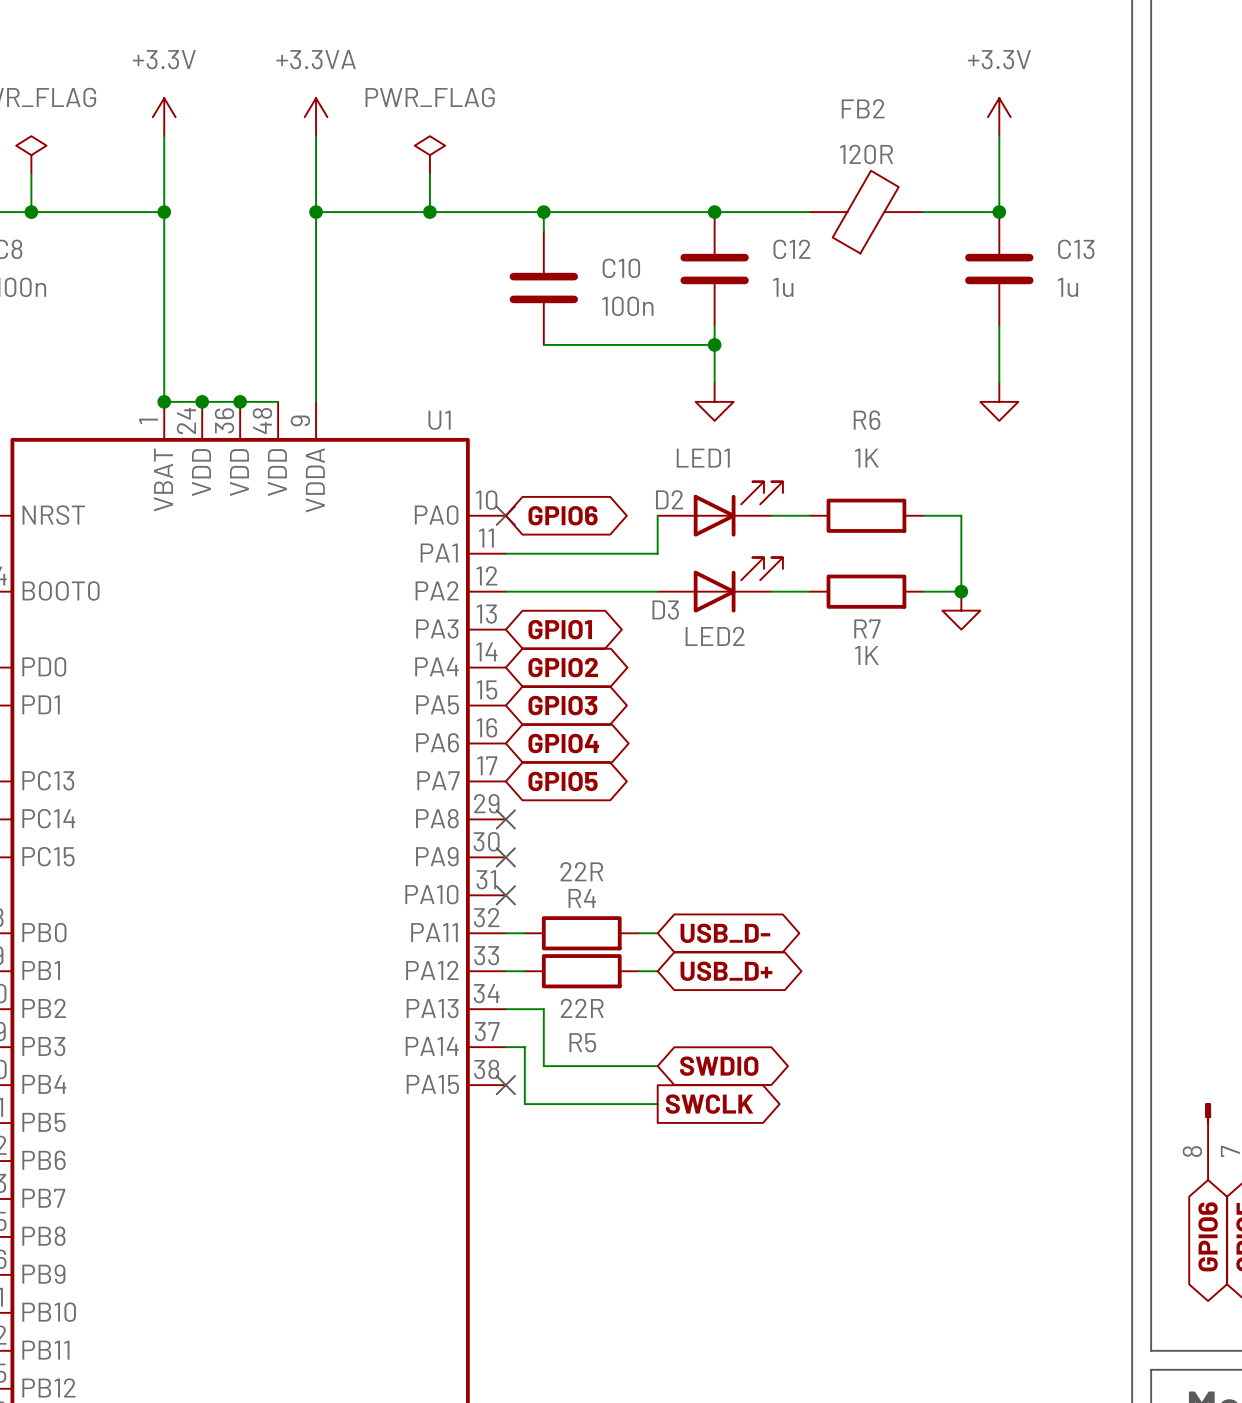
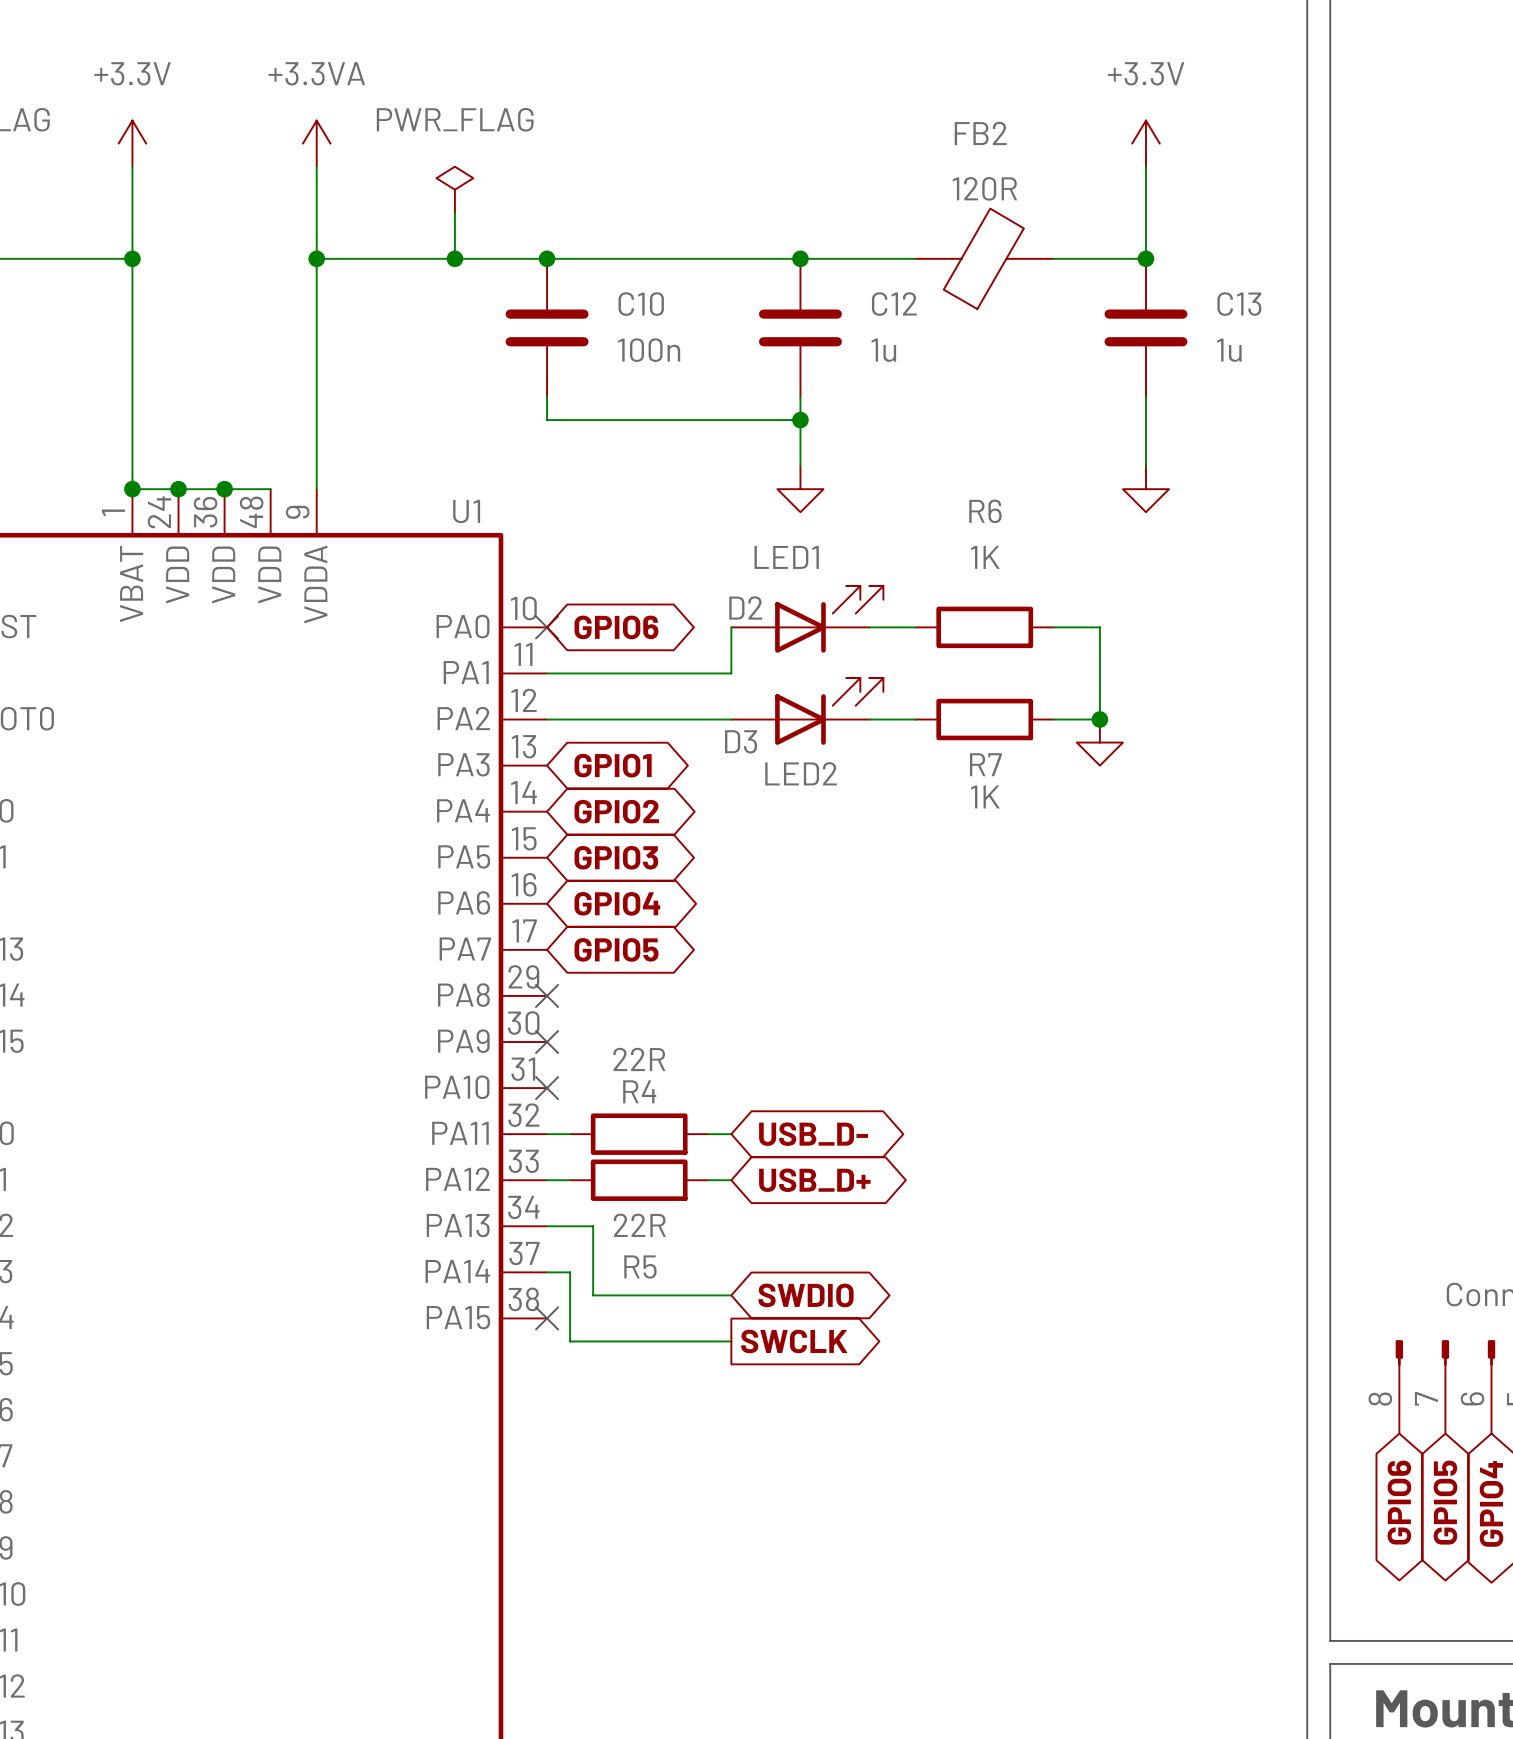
wire: (543, 212) (543, 231) -> none
junction position: (543, 212) -> (547, 258)
C10 position: (543, 288) -> (547, 327)
wire: none -> (547, 397) (547, 420) (593, 420)

